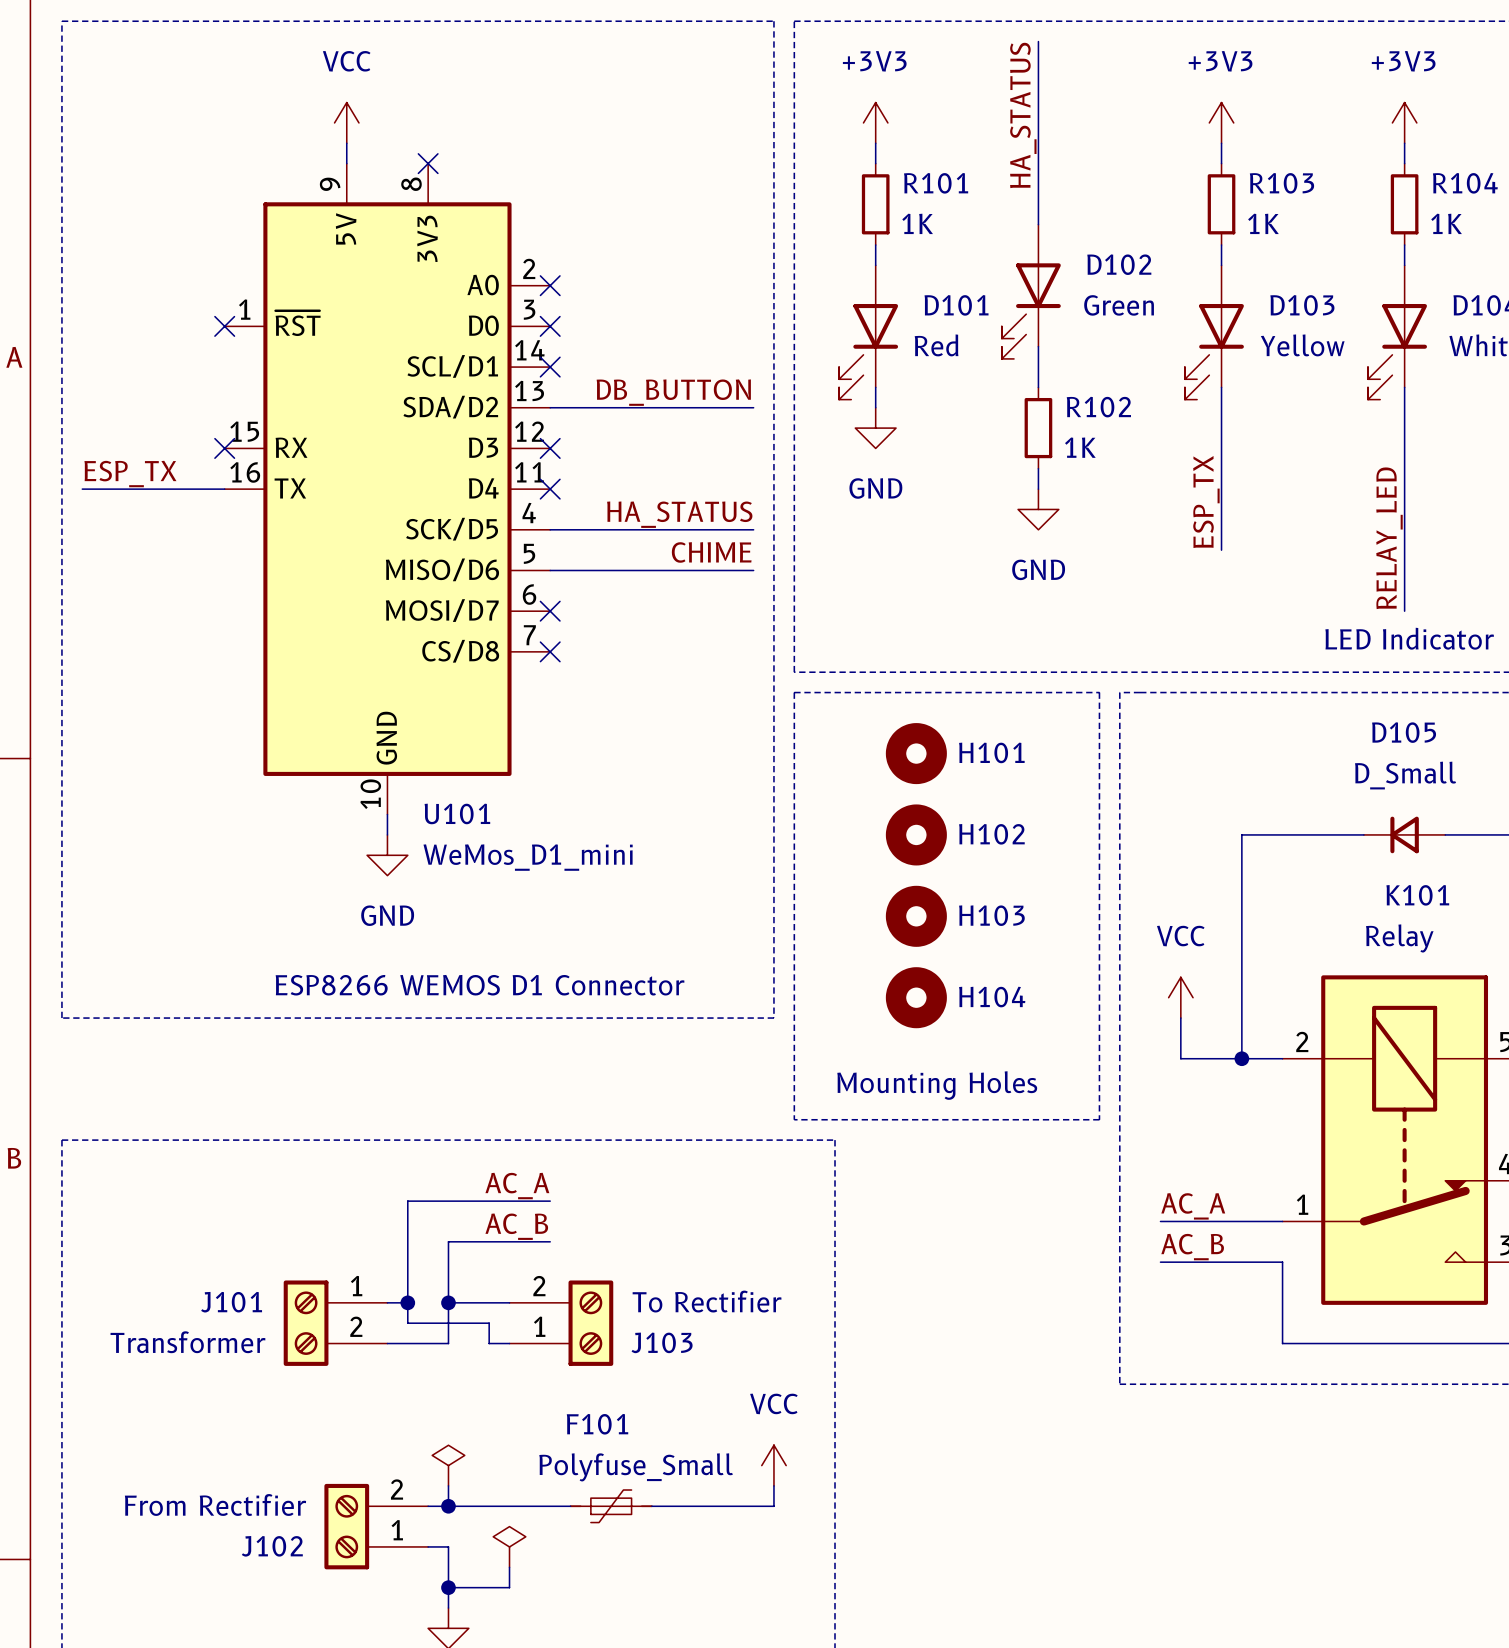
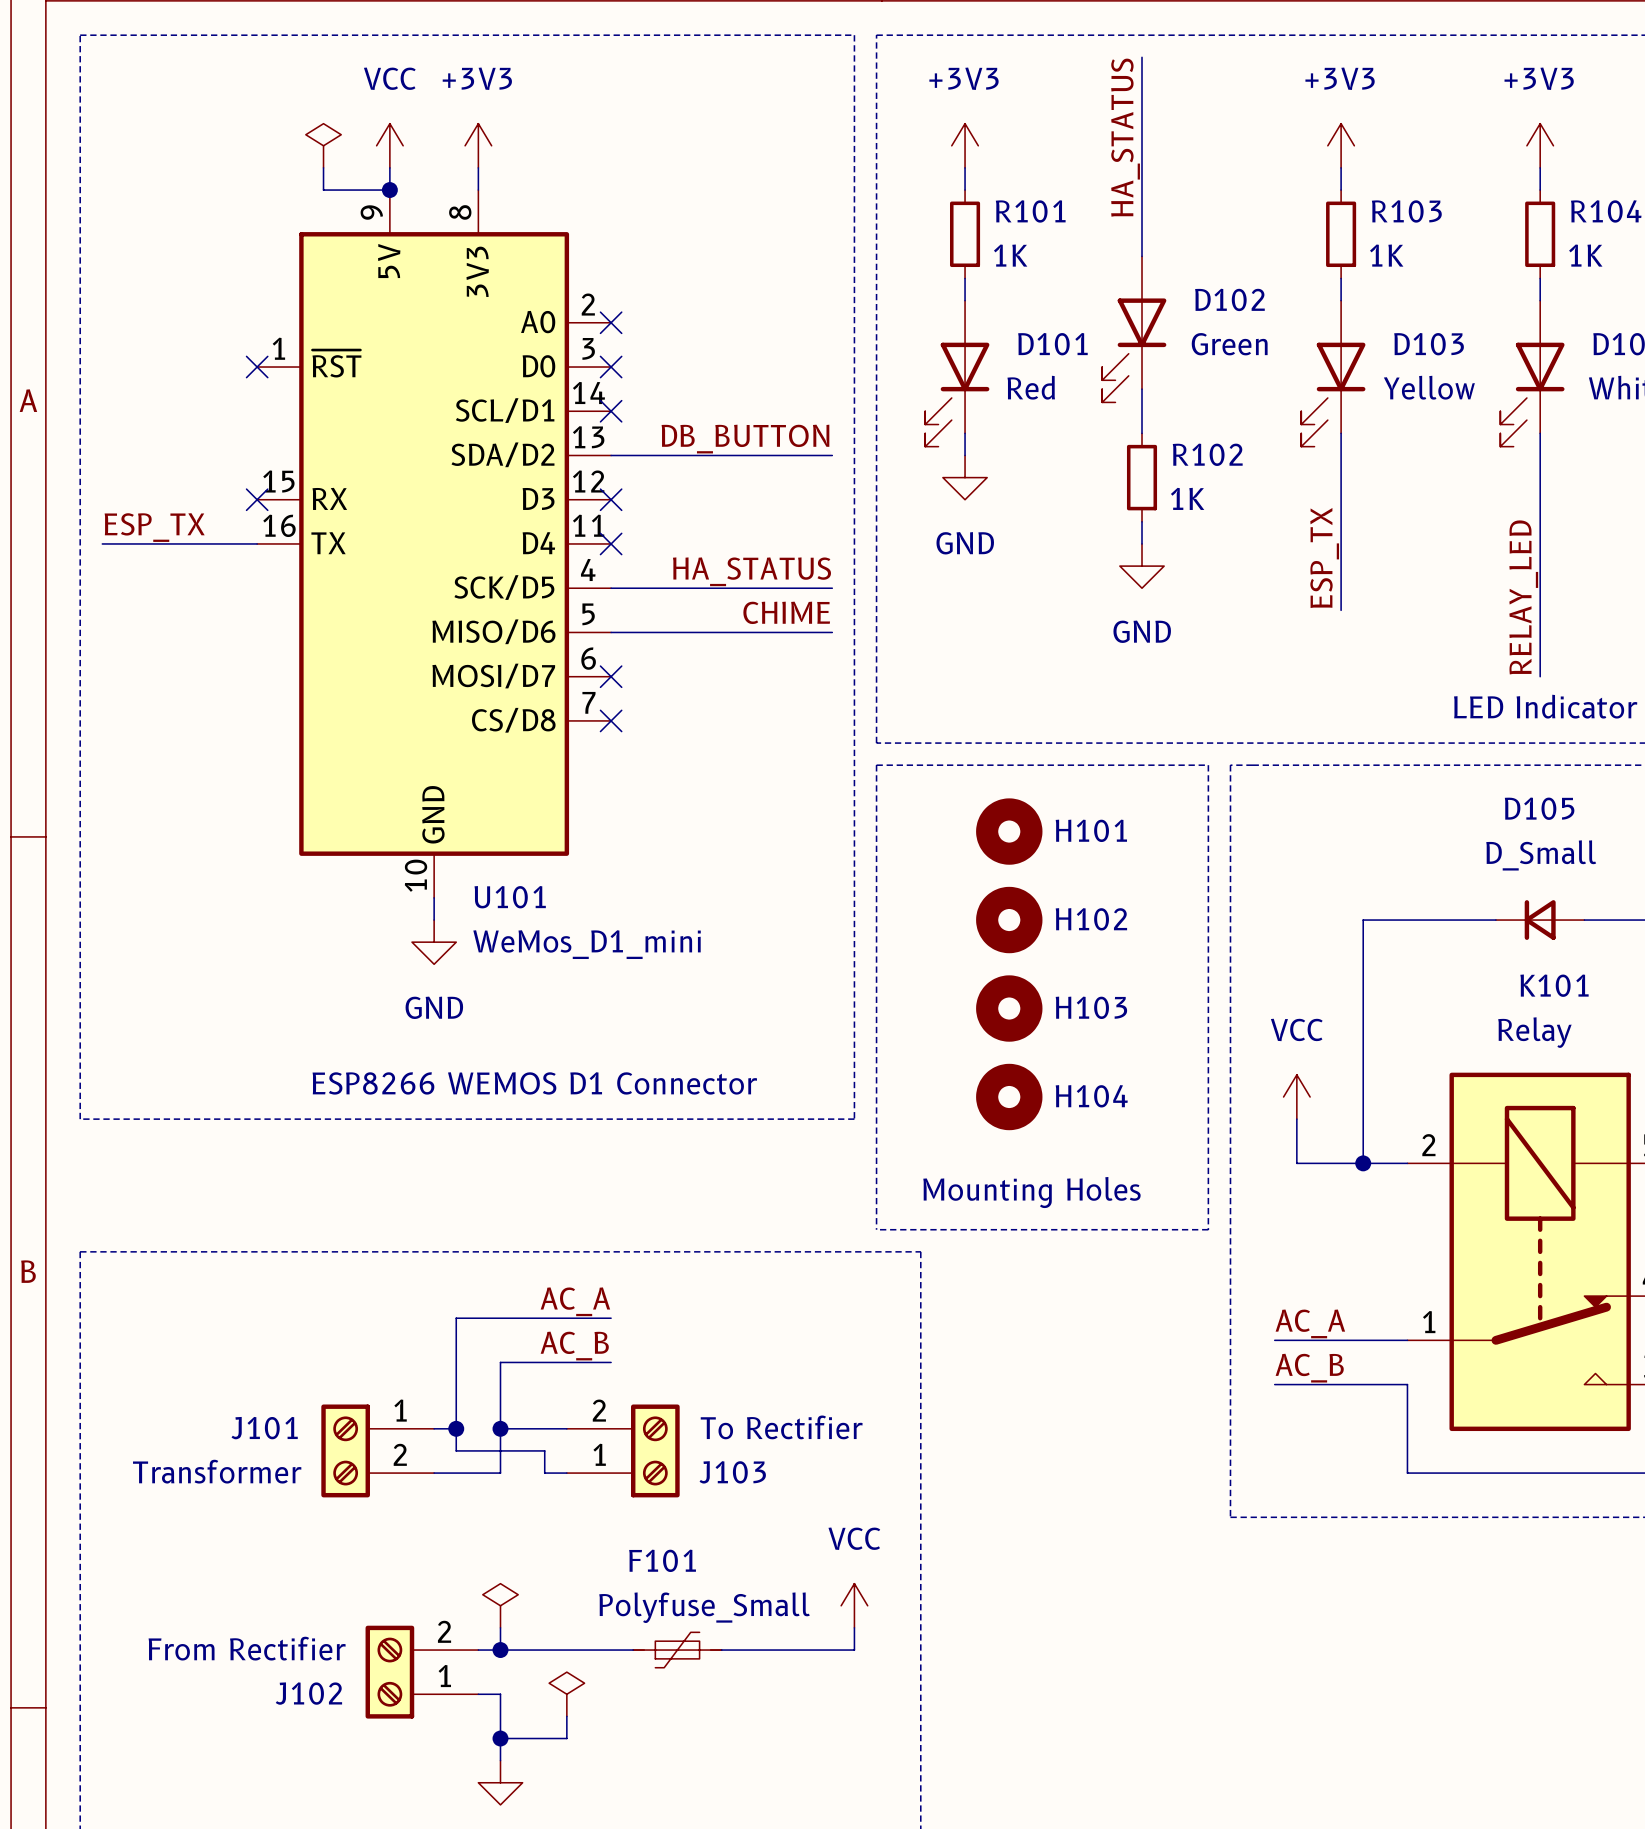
power symbol: none -> (323, 145)
power symbol: none -> +3V3 (478, 145)
wire: none -> (323, 167) (323, 190) (389, 190)
wire: none -> (478, 167) (478, 190)
junction: none -> (389, 190)
no-connect mark: (428, 163) -> none

